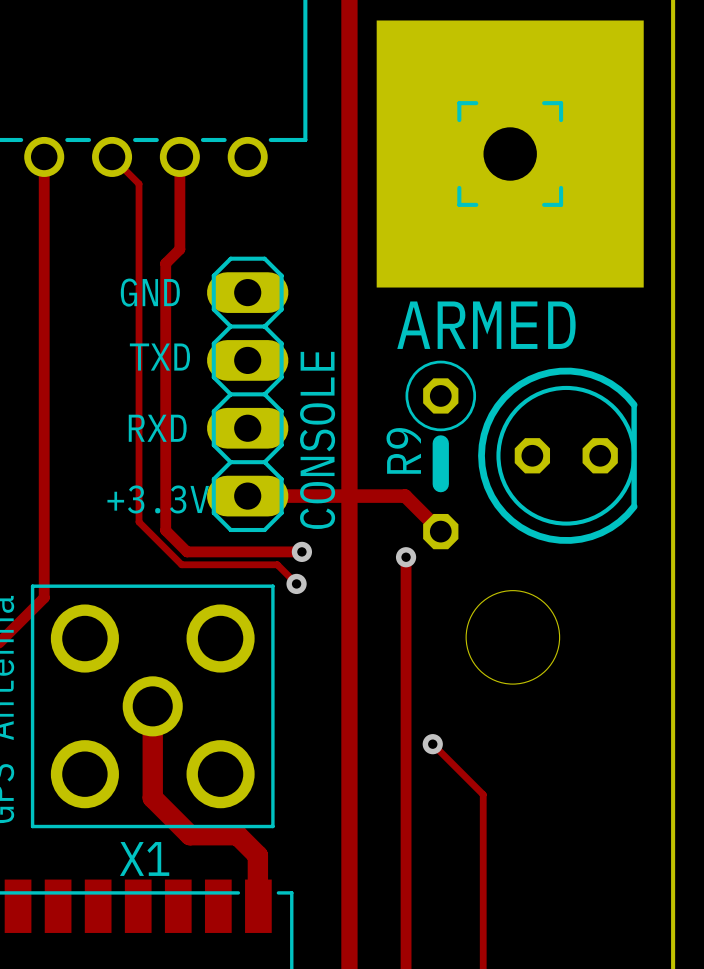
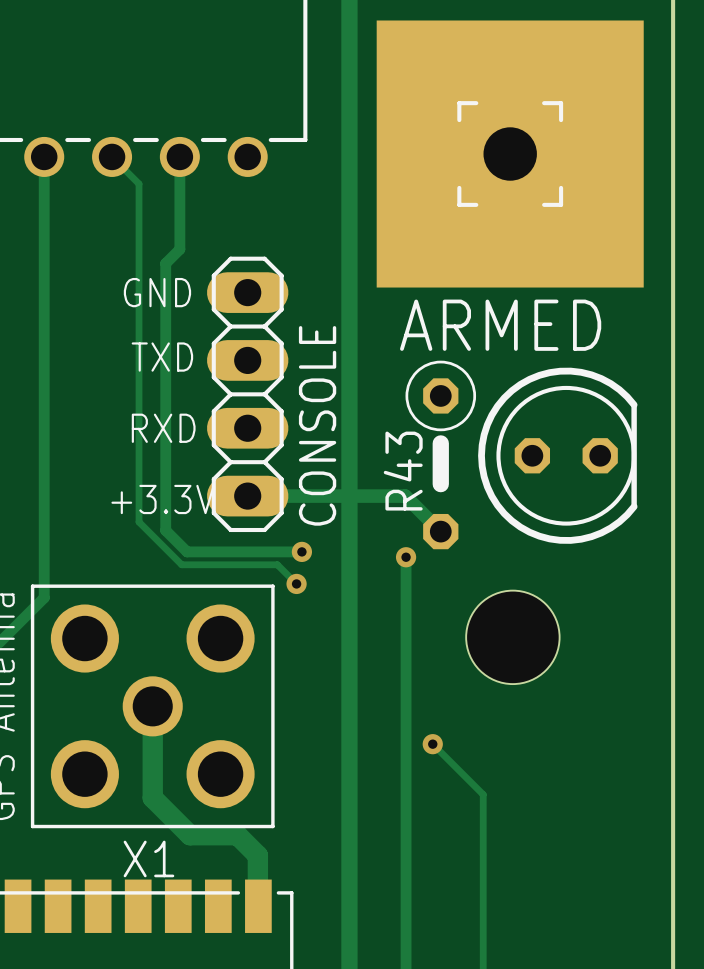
R9 name: R9 (403, 450) -> R43 (403, 471)

